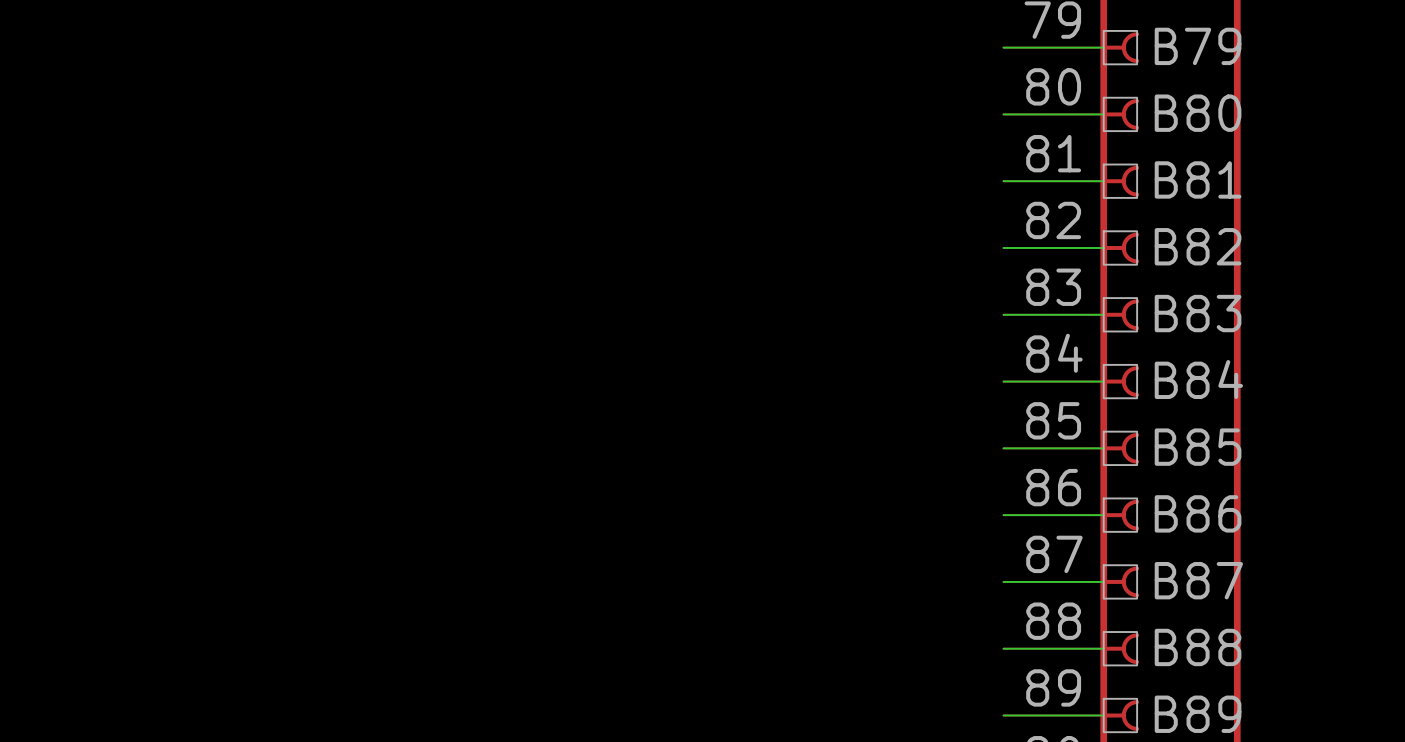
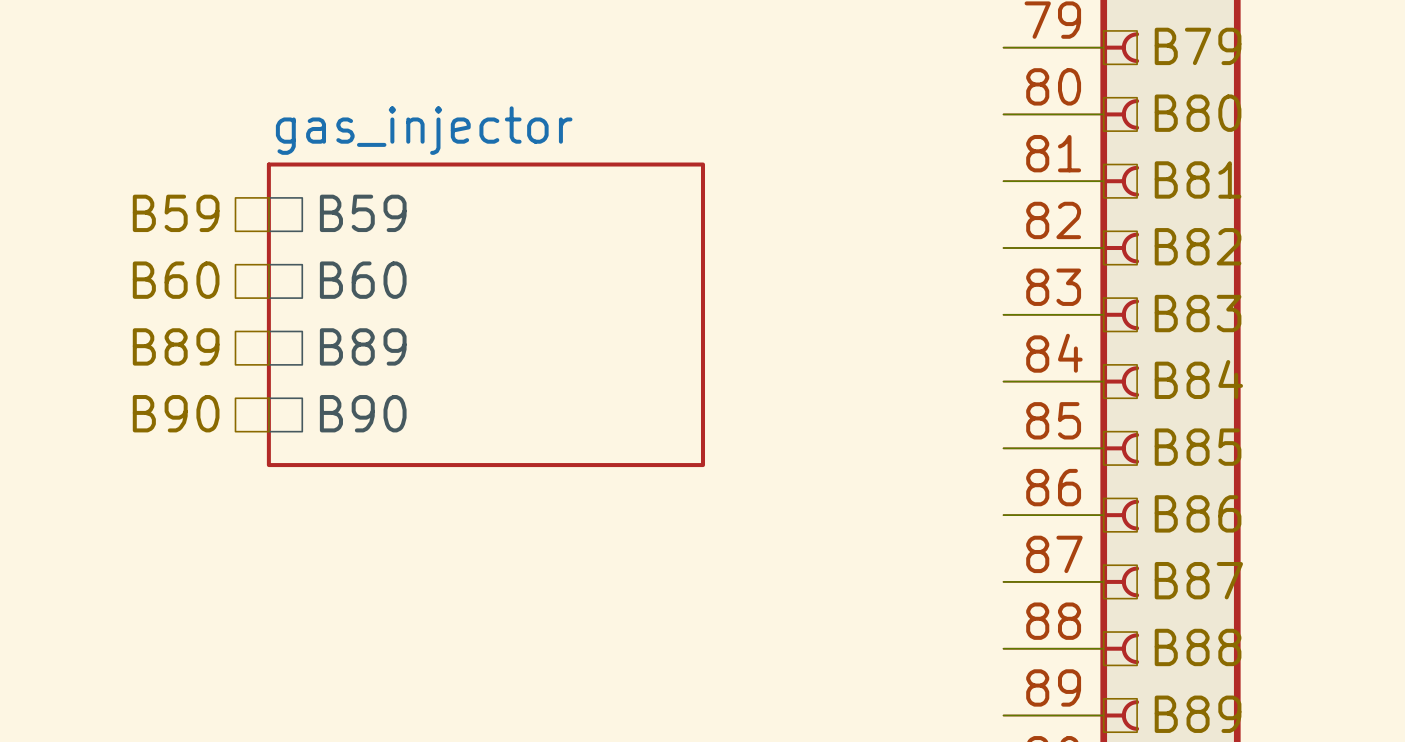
hierarchical label: none -> B59 (176, 213)
sheet pin: none -> B59 (363, 213)
hierarchical label: none -> B60 (176, 280)
sheet pin: none -> B60 (363, 280)
sheet gas_injector: none -> (485, 314)
hierarchical label: none -> B89 (176, 346)
sheet pin: none -> B89 (363, 346)
hierarchical label: none -> B90 (176, 413)
sheet pin: none -> B90 (363, 413)

